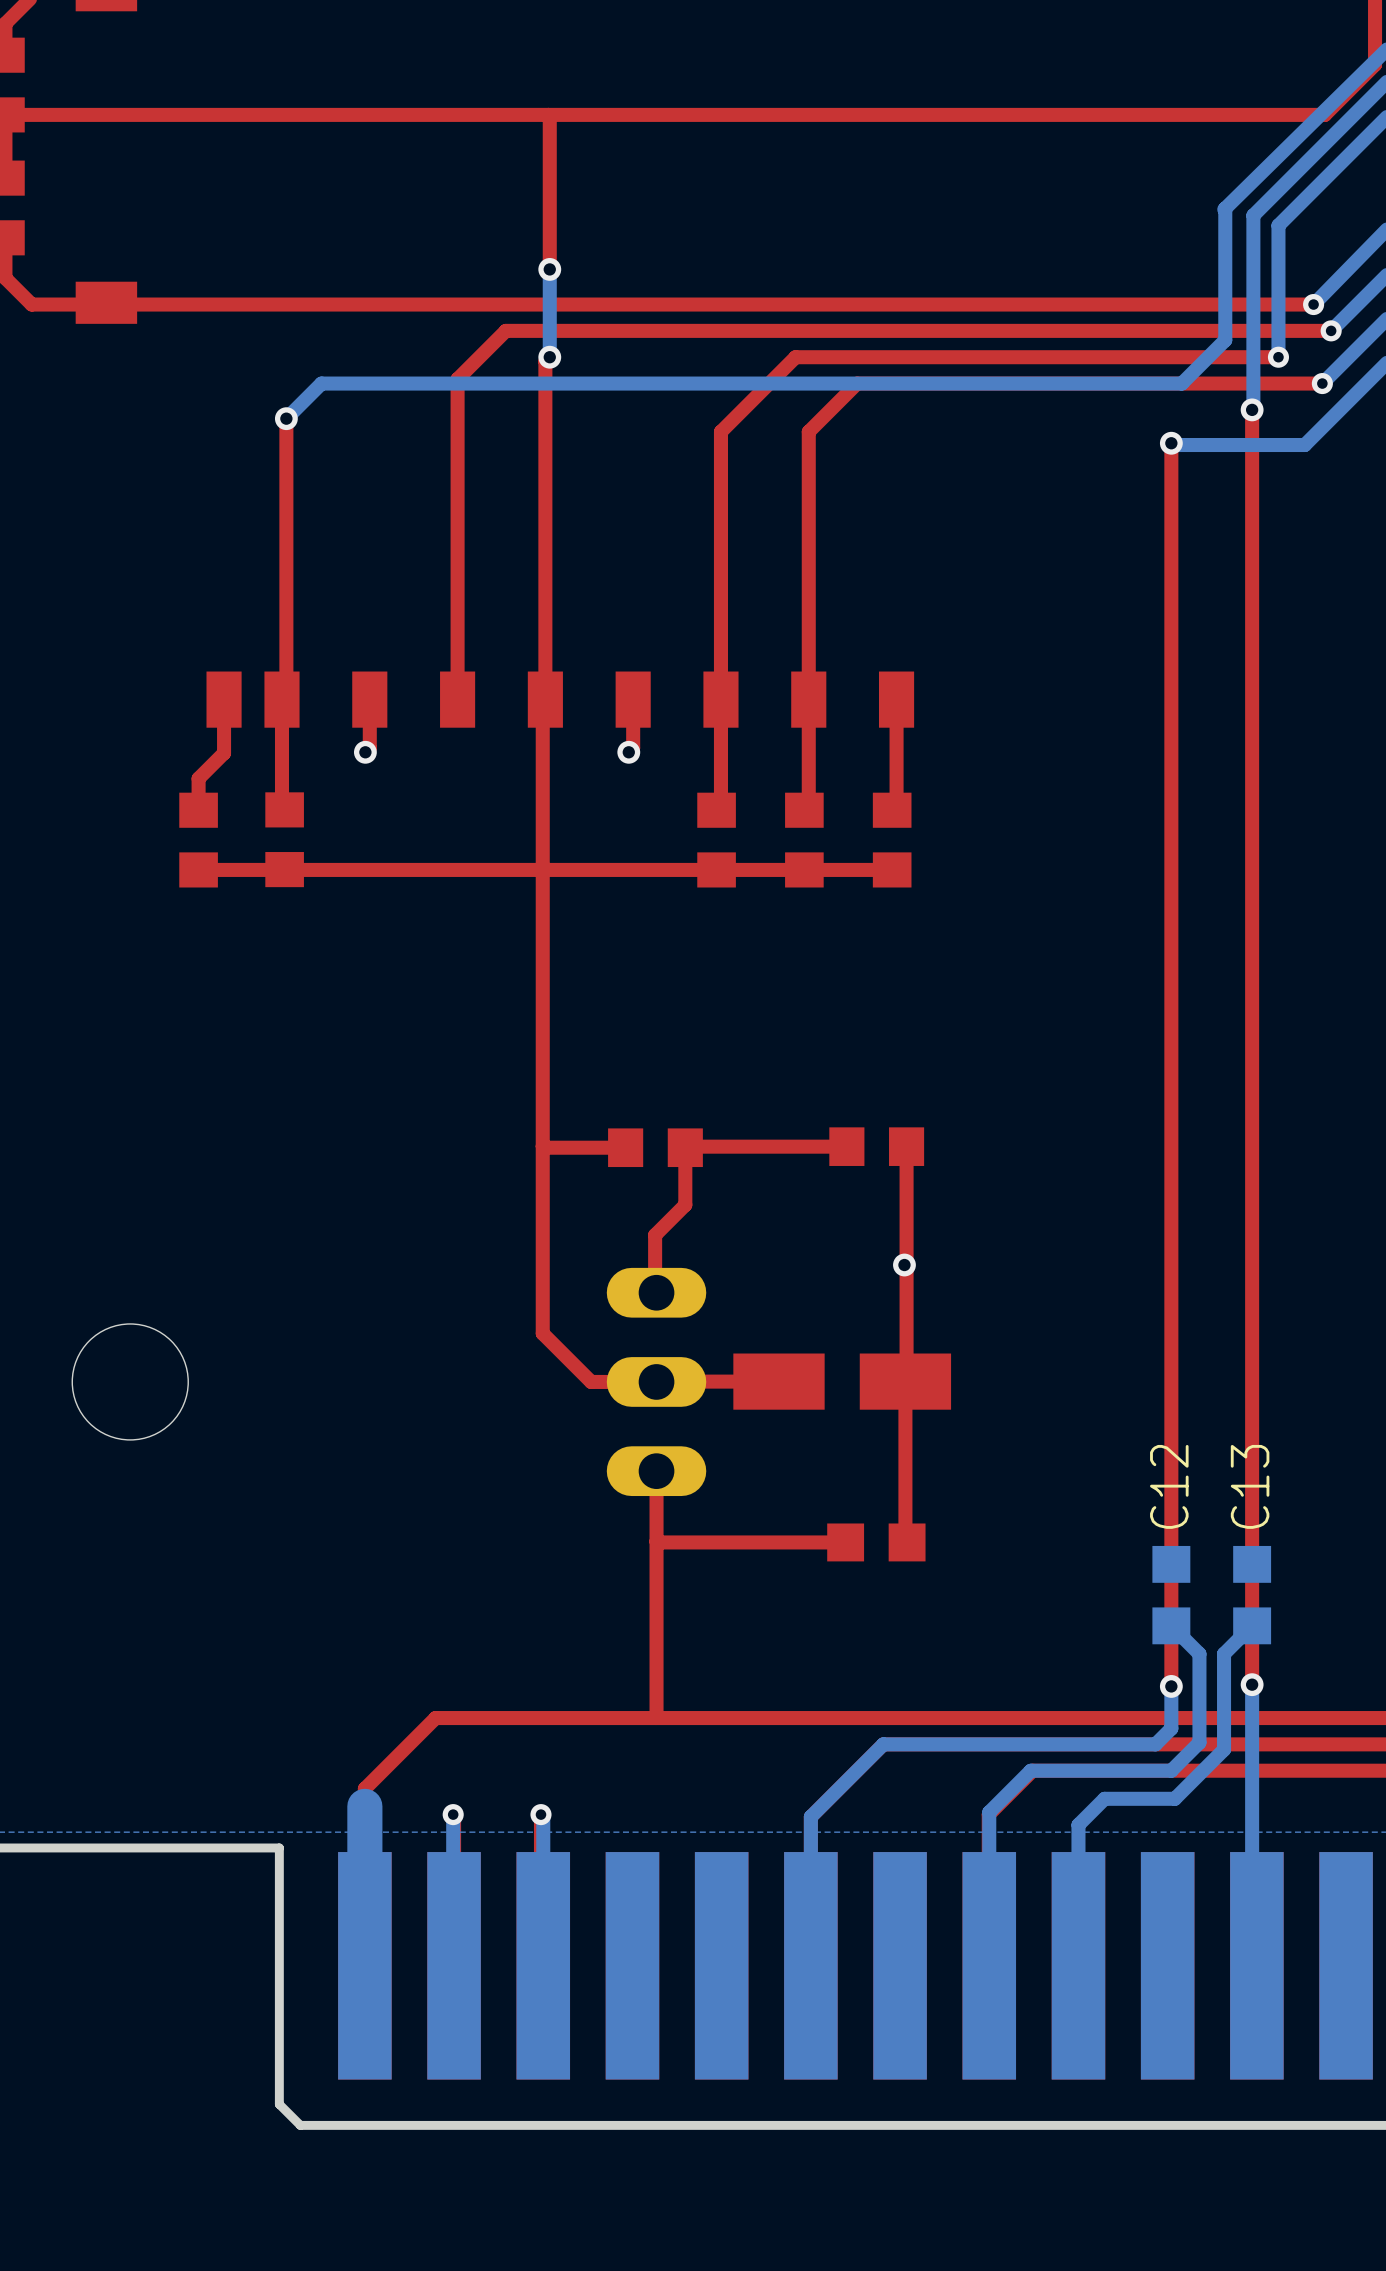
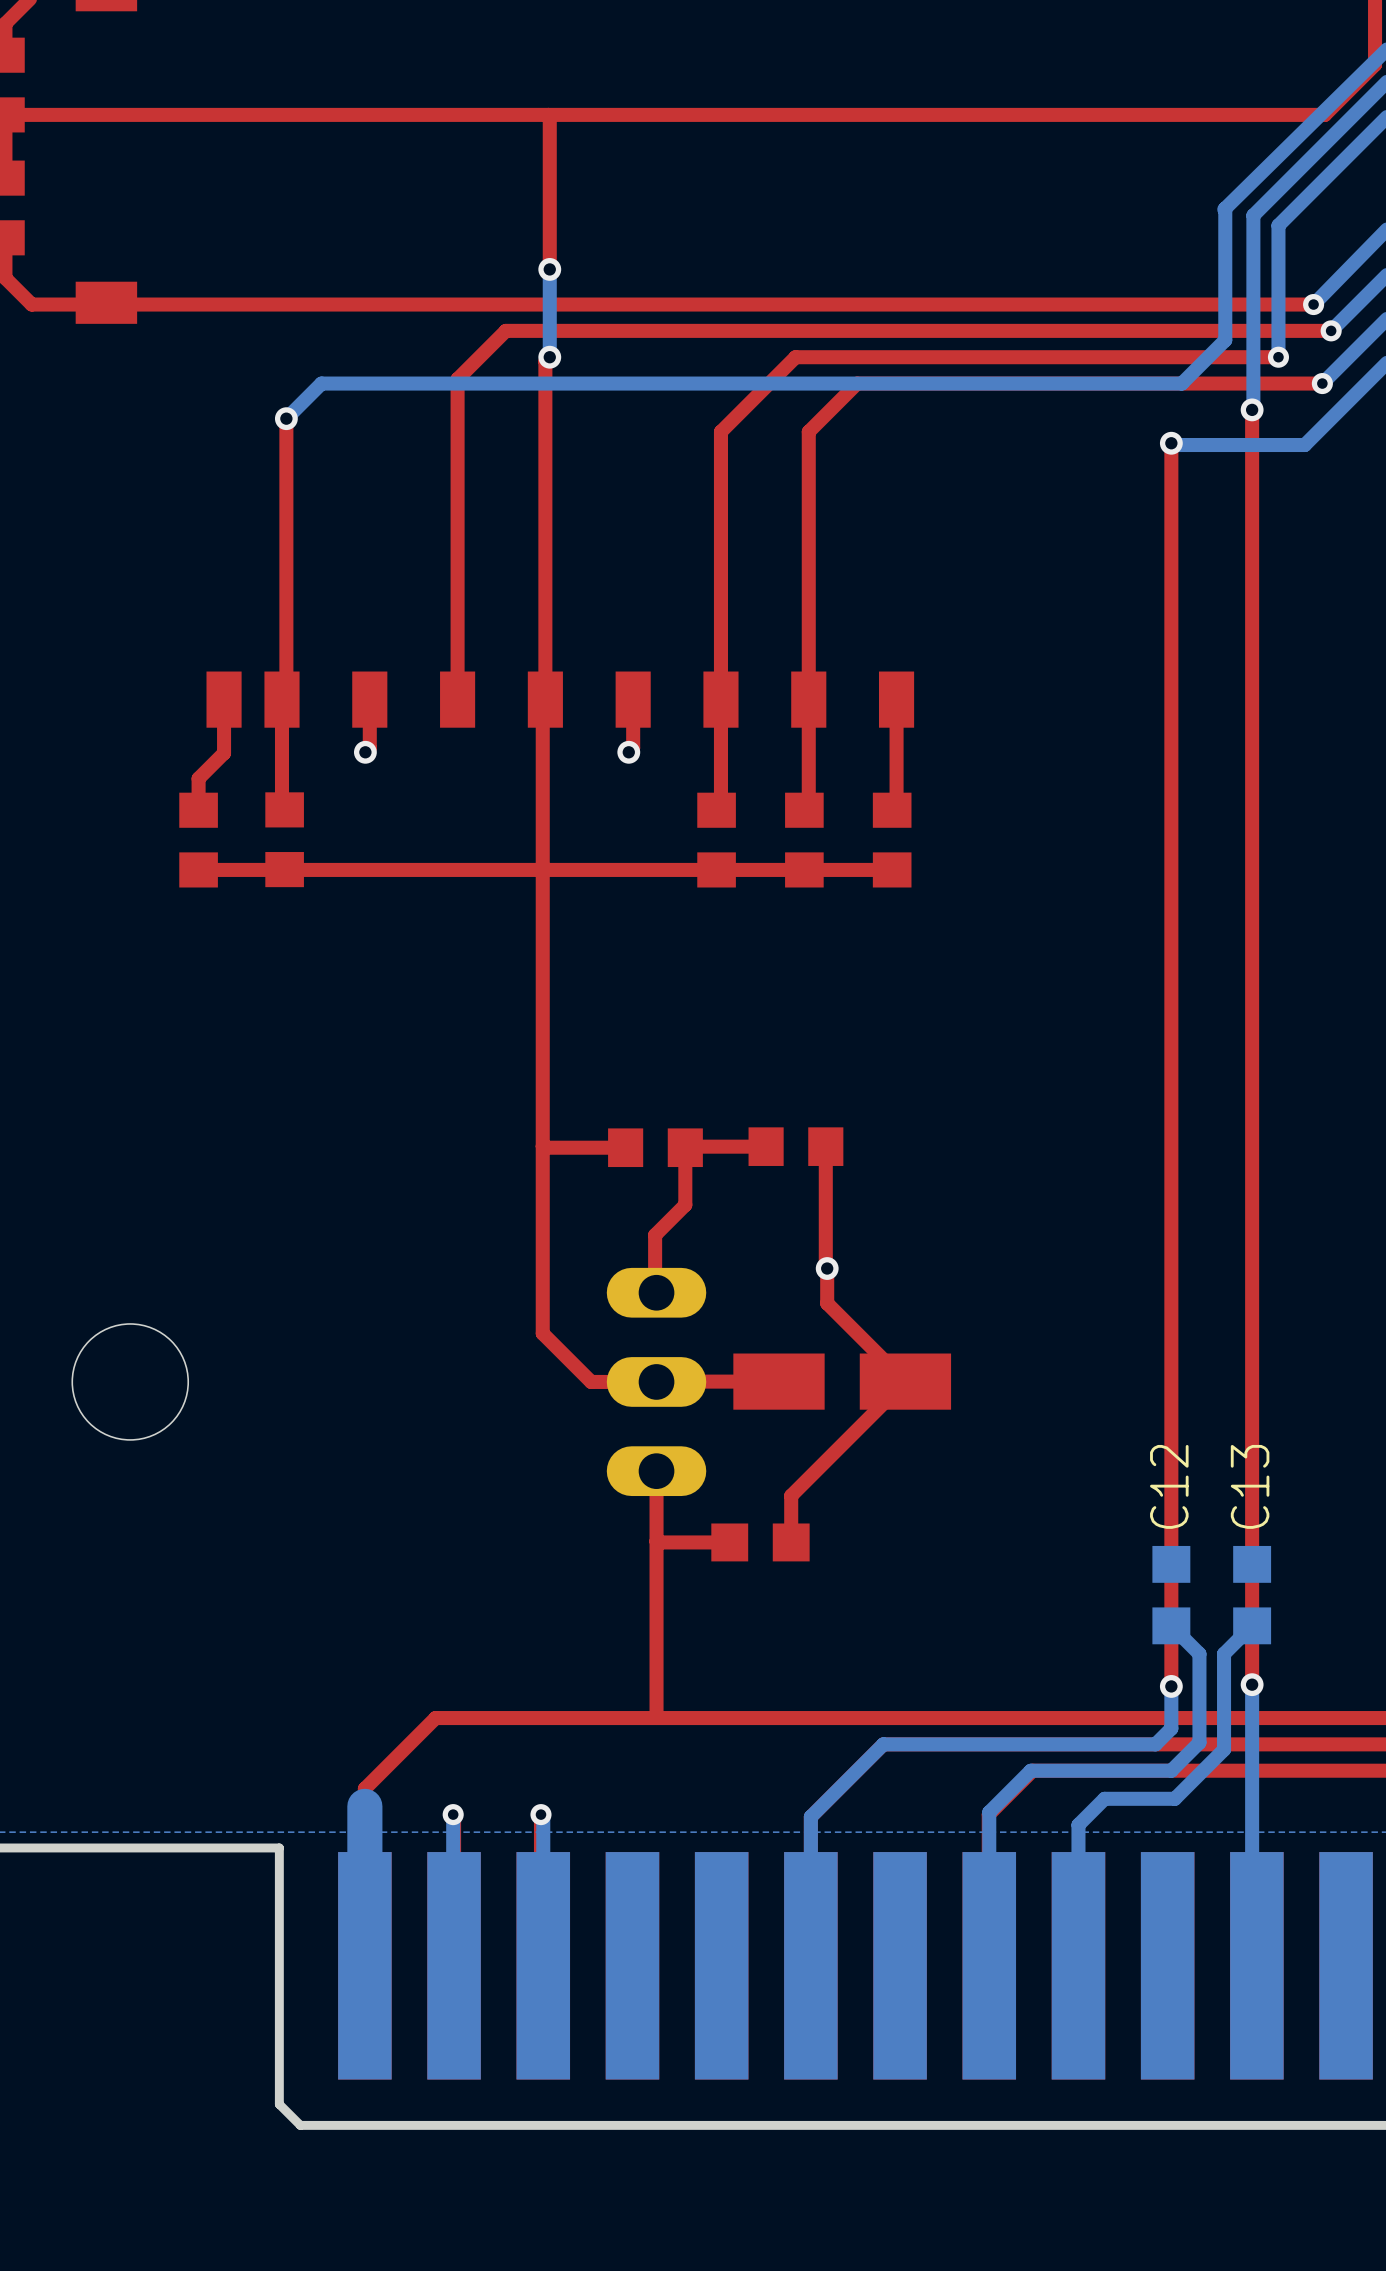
top track: none -> (825, 1146) (827, 1303) (905, 1381) (791, 1495) (791, 1542) (786, 1538)
top track: (846, 1146) (766, 1146) -> none
part position: (876, 1146) -> (795, 1146)
top track: (906, 1146) (906, 1262) (904, 1265) (906, 1267) (905, 1540) (907, 1542) -> none
via position: (904, 1265) -> (827, 1268)
top track: (845, 1542) (729, 1542) -> none
part position: (876, 1542) -> (760, 1542)

